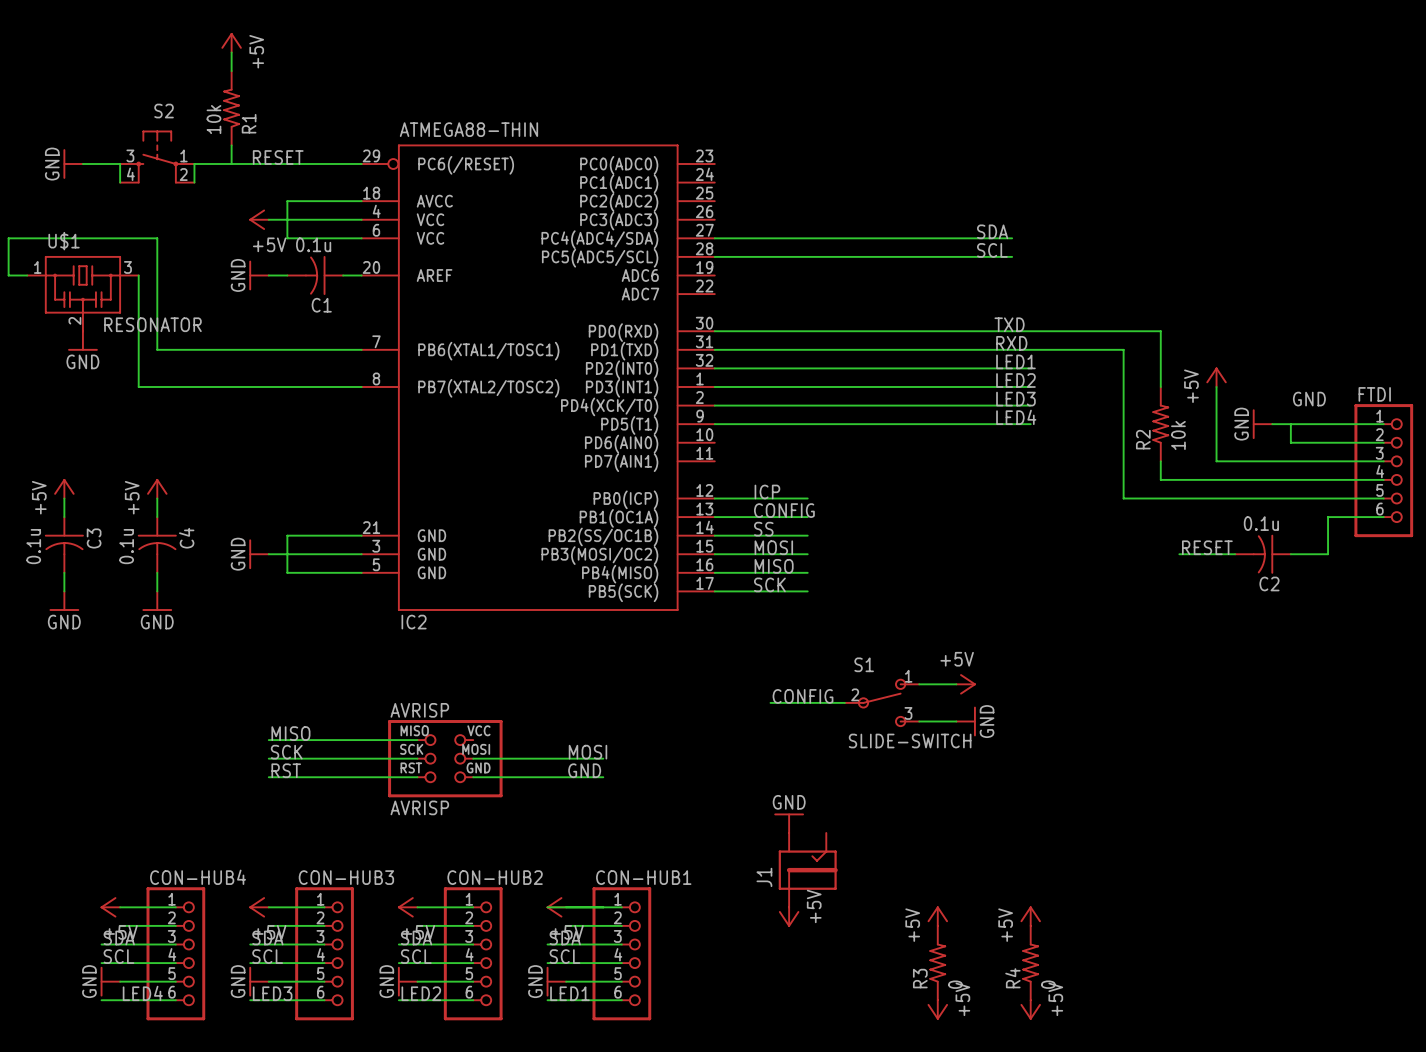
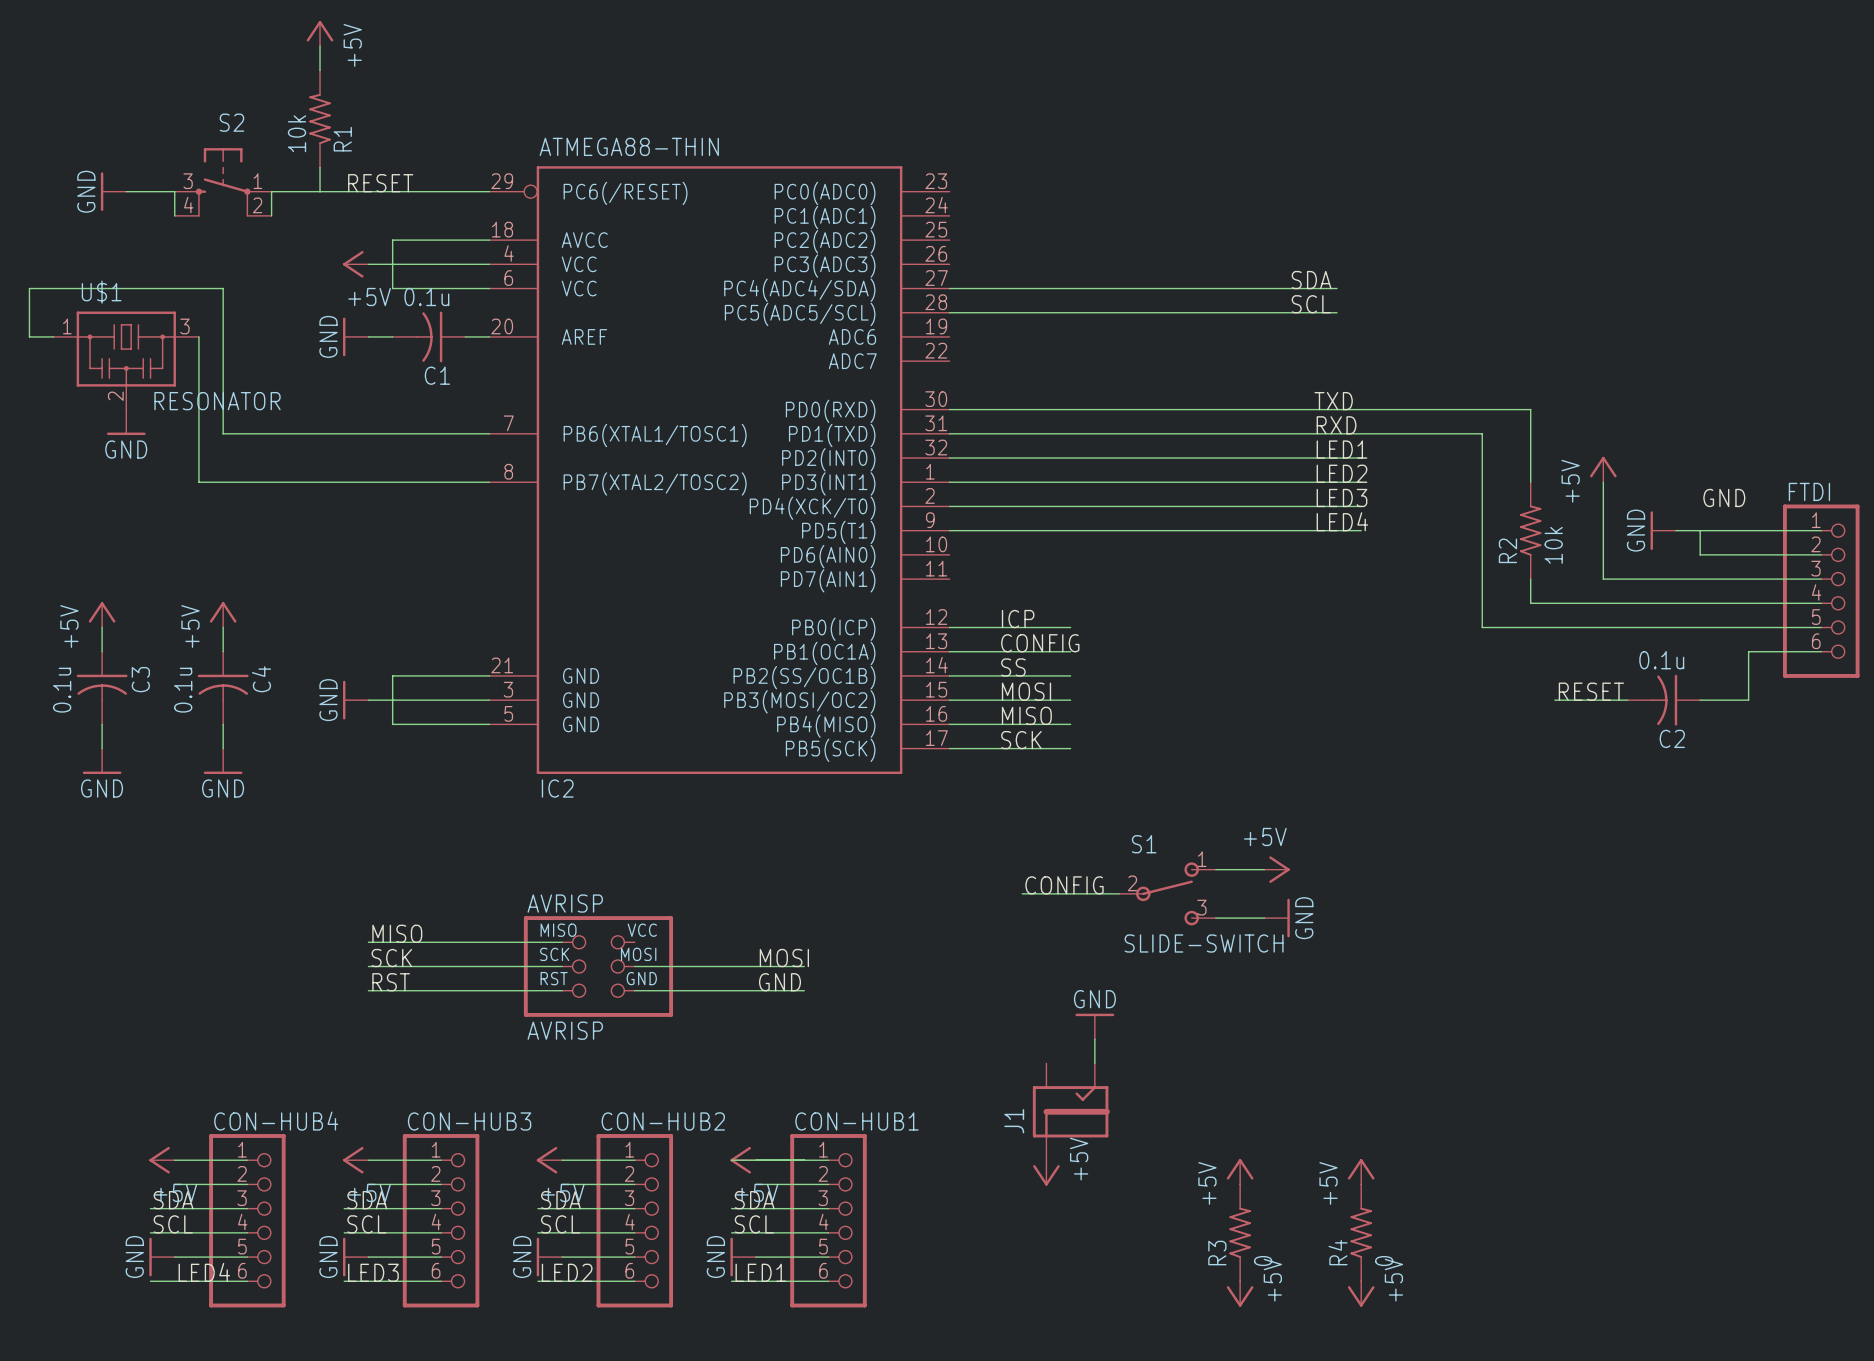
wire: none -> (1094, 1039) (1094, 1063)
power symbol position: GND (789, 823) -> GND (1094, 1026)

